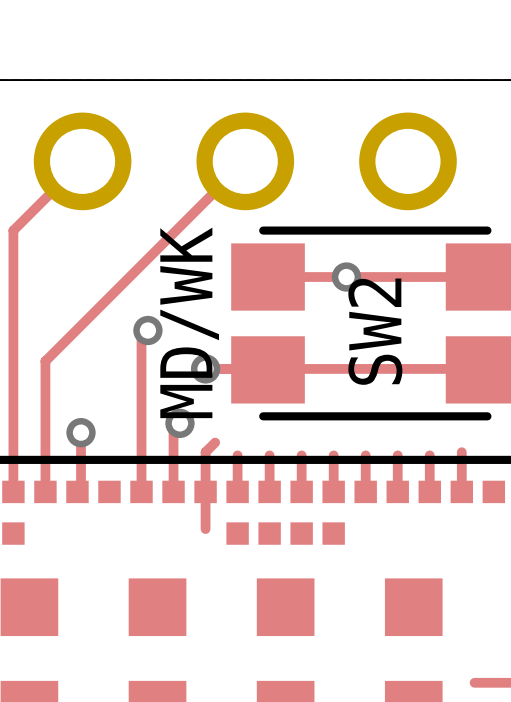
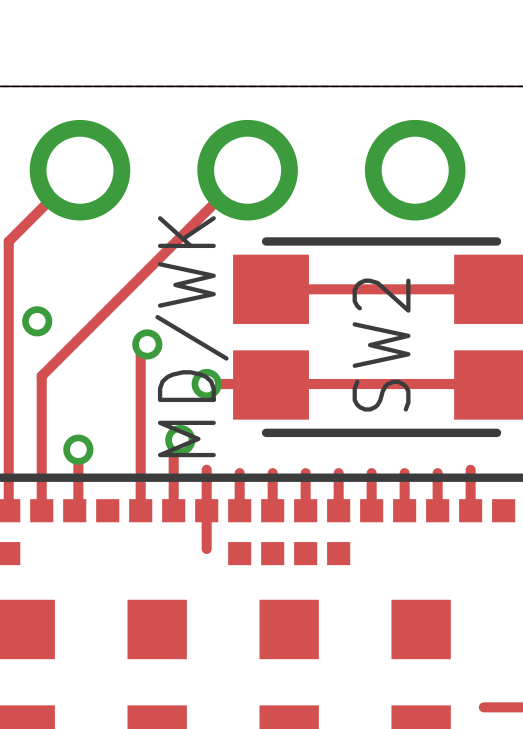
via position: (346, 277) -> (37, 321)
track: (215, 442) (205, 452) -> none

